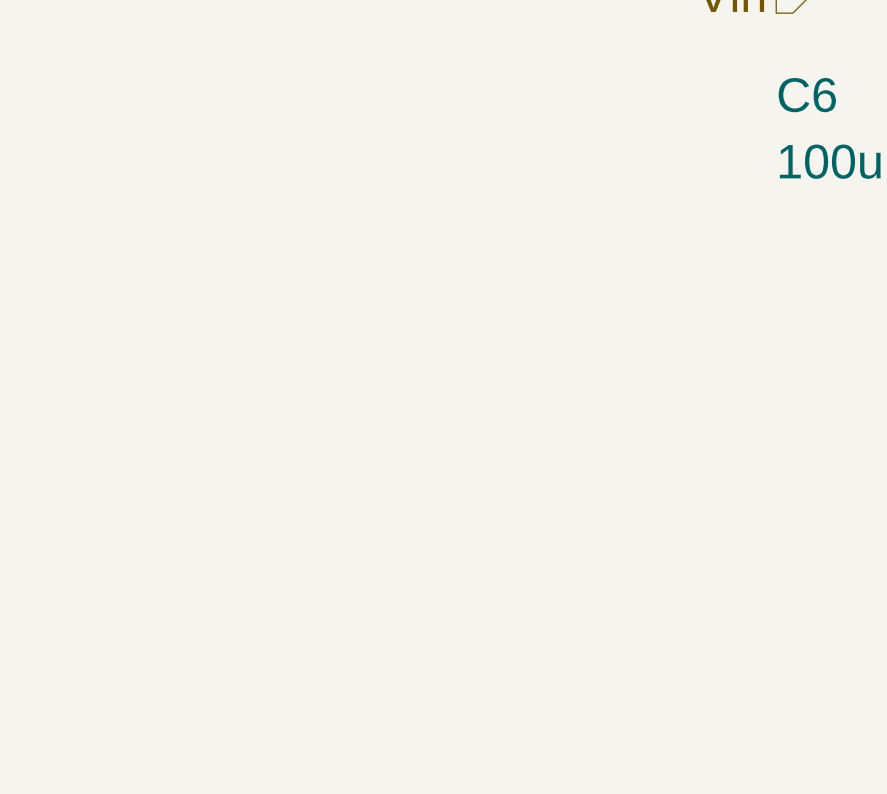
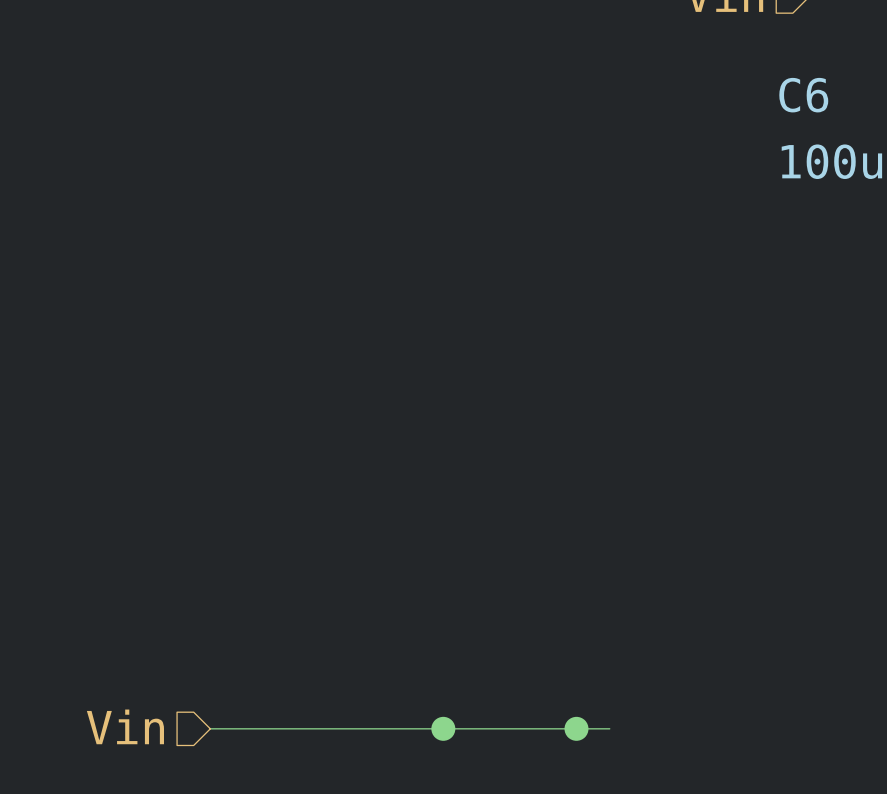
hierarchical label: none -> Vin (125, 726)
wire: none -> (210, 728) (609, 728)
junction: none -> (443, 728)
junction: none -> (576, 728)

